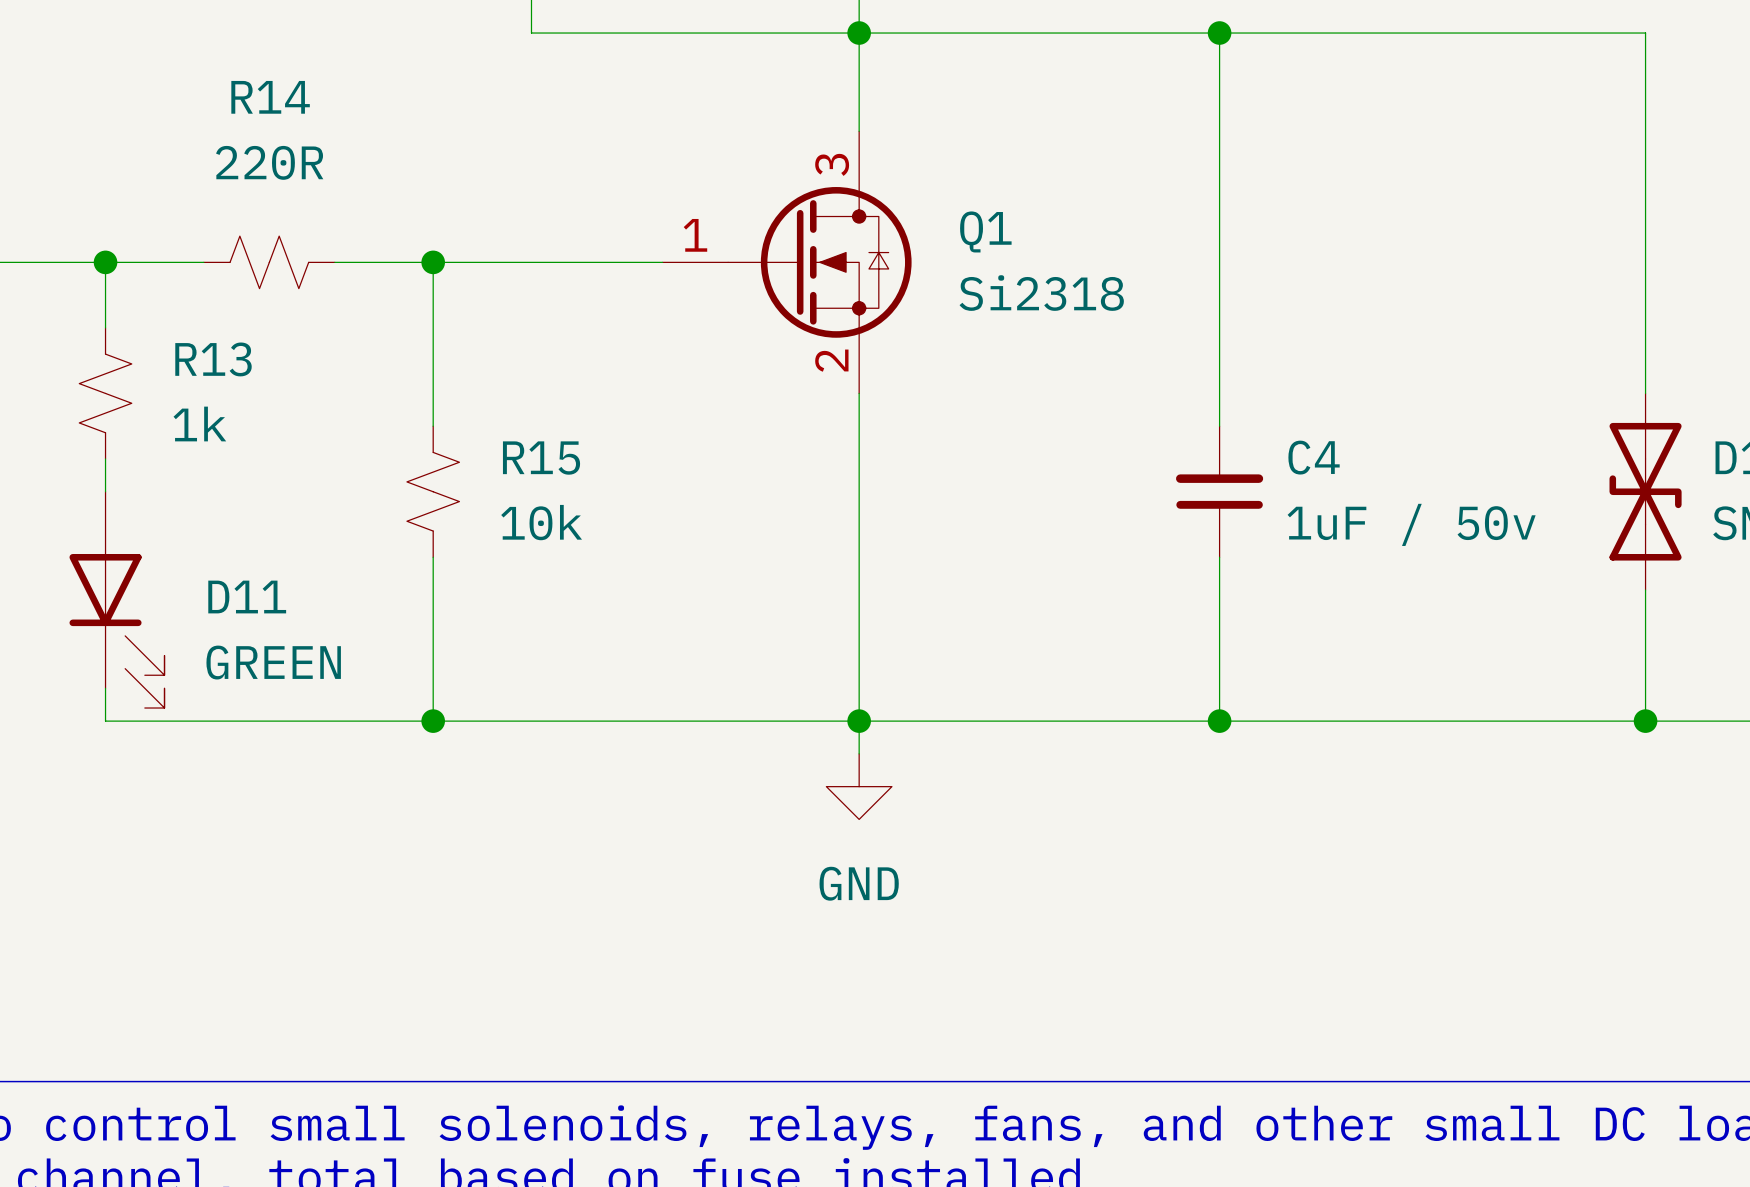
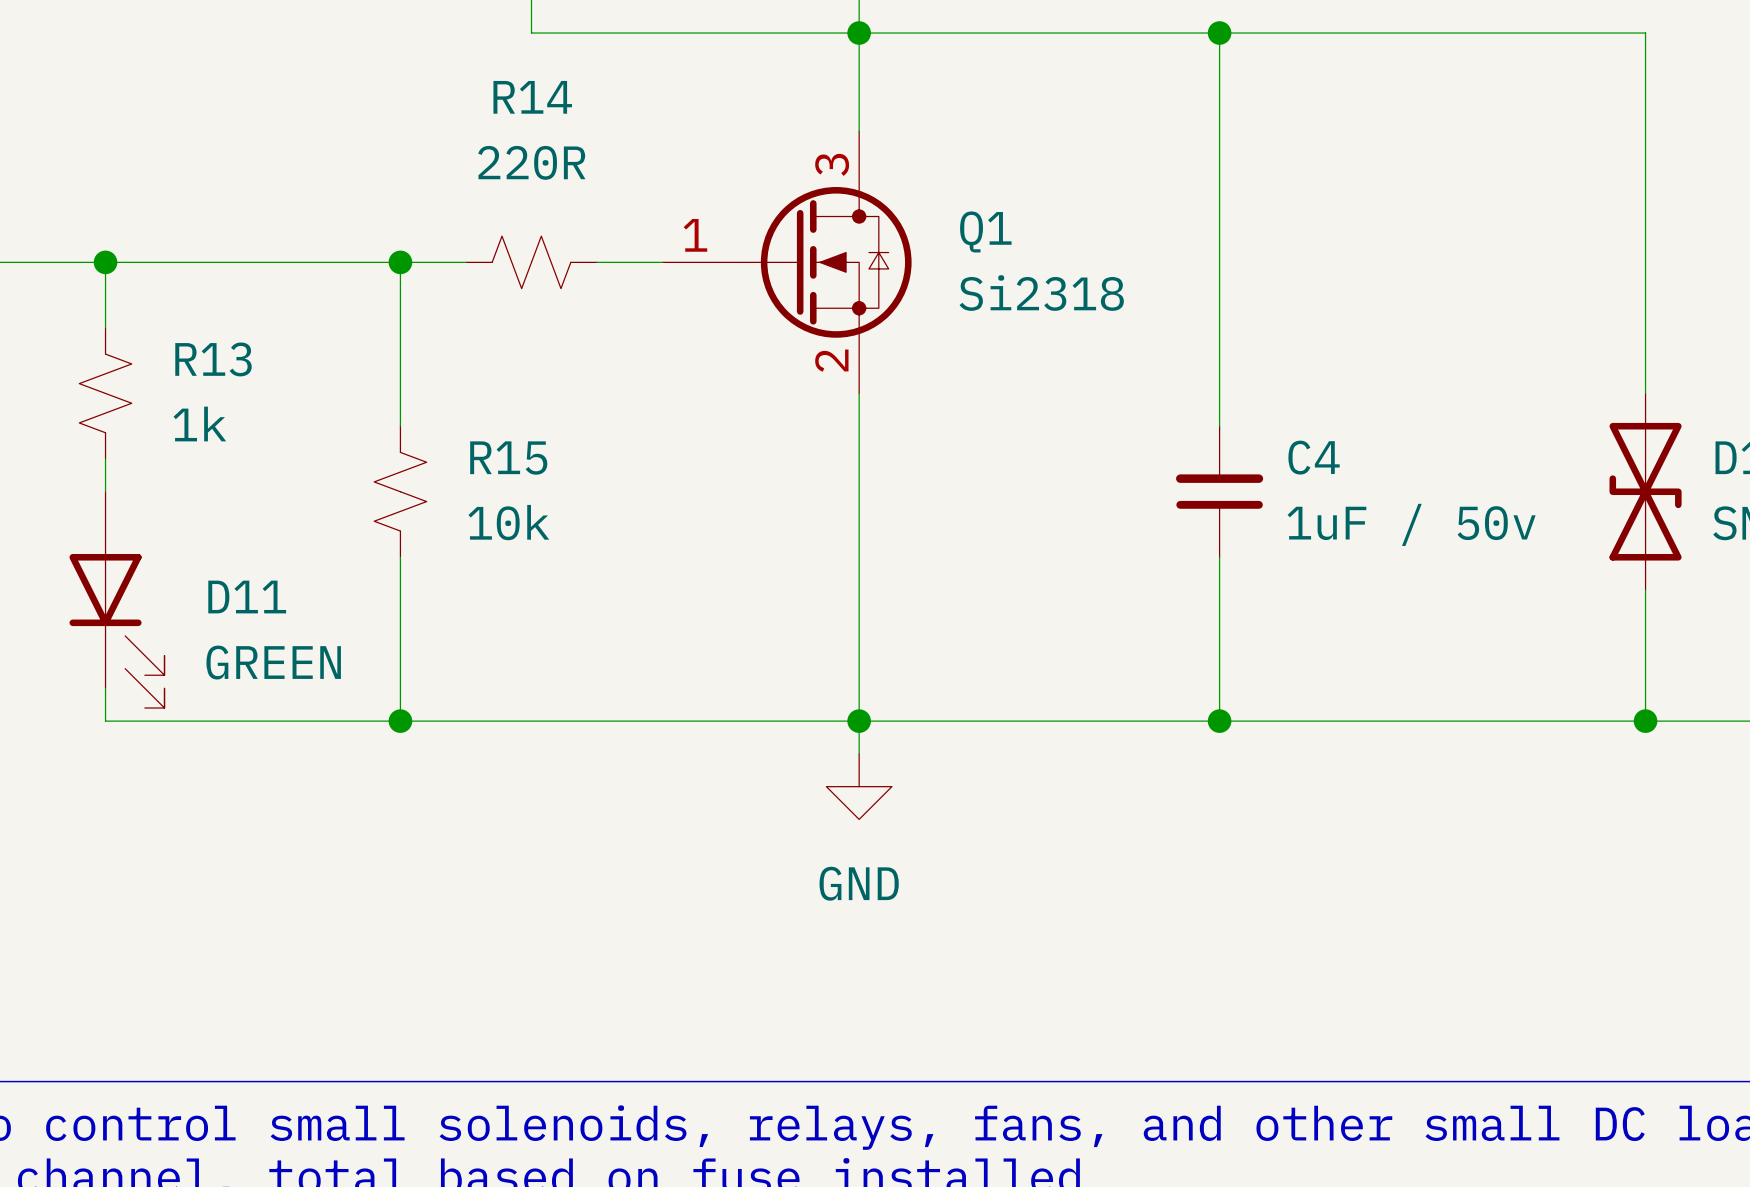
R14 position: (269, 262) -> (531, 262)
wire: (433, 262) (433, 426) -> (400, 262) (400, 426)
junction position: (433, 262) -> (400, 262)
wire: (465, 262) (597, 262) -> (203, 262) (334, 262)
R15 position: (433, 491) -> (400, 491)
wire: (433, 557) (433, 721) -> (400, 557) (400, 721)
junction position: (433, 721) -> (400, 721)

